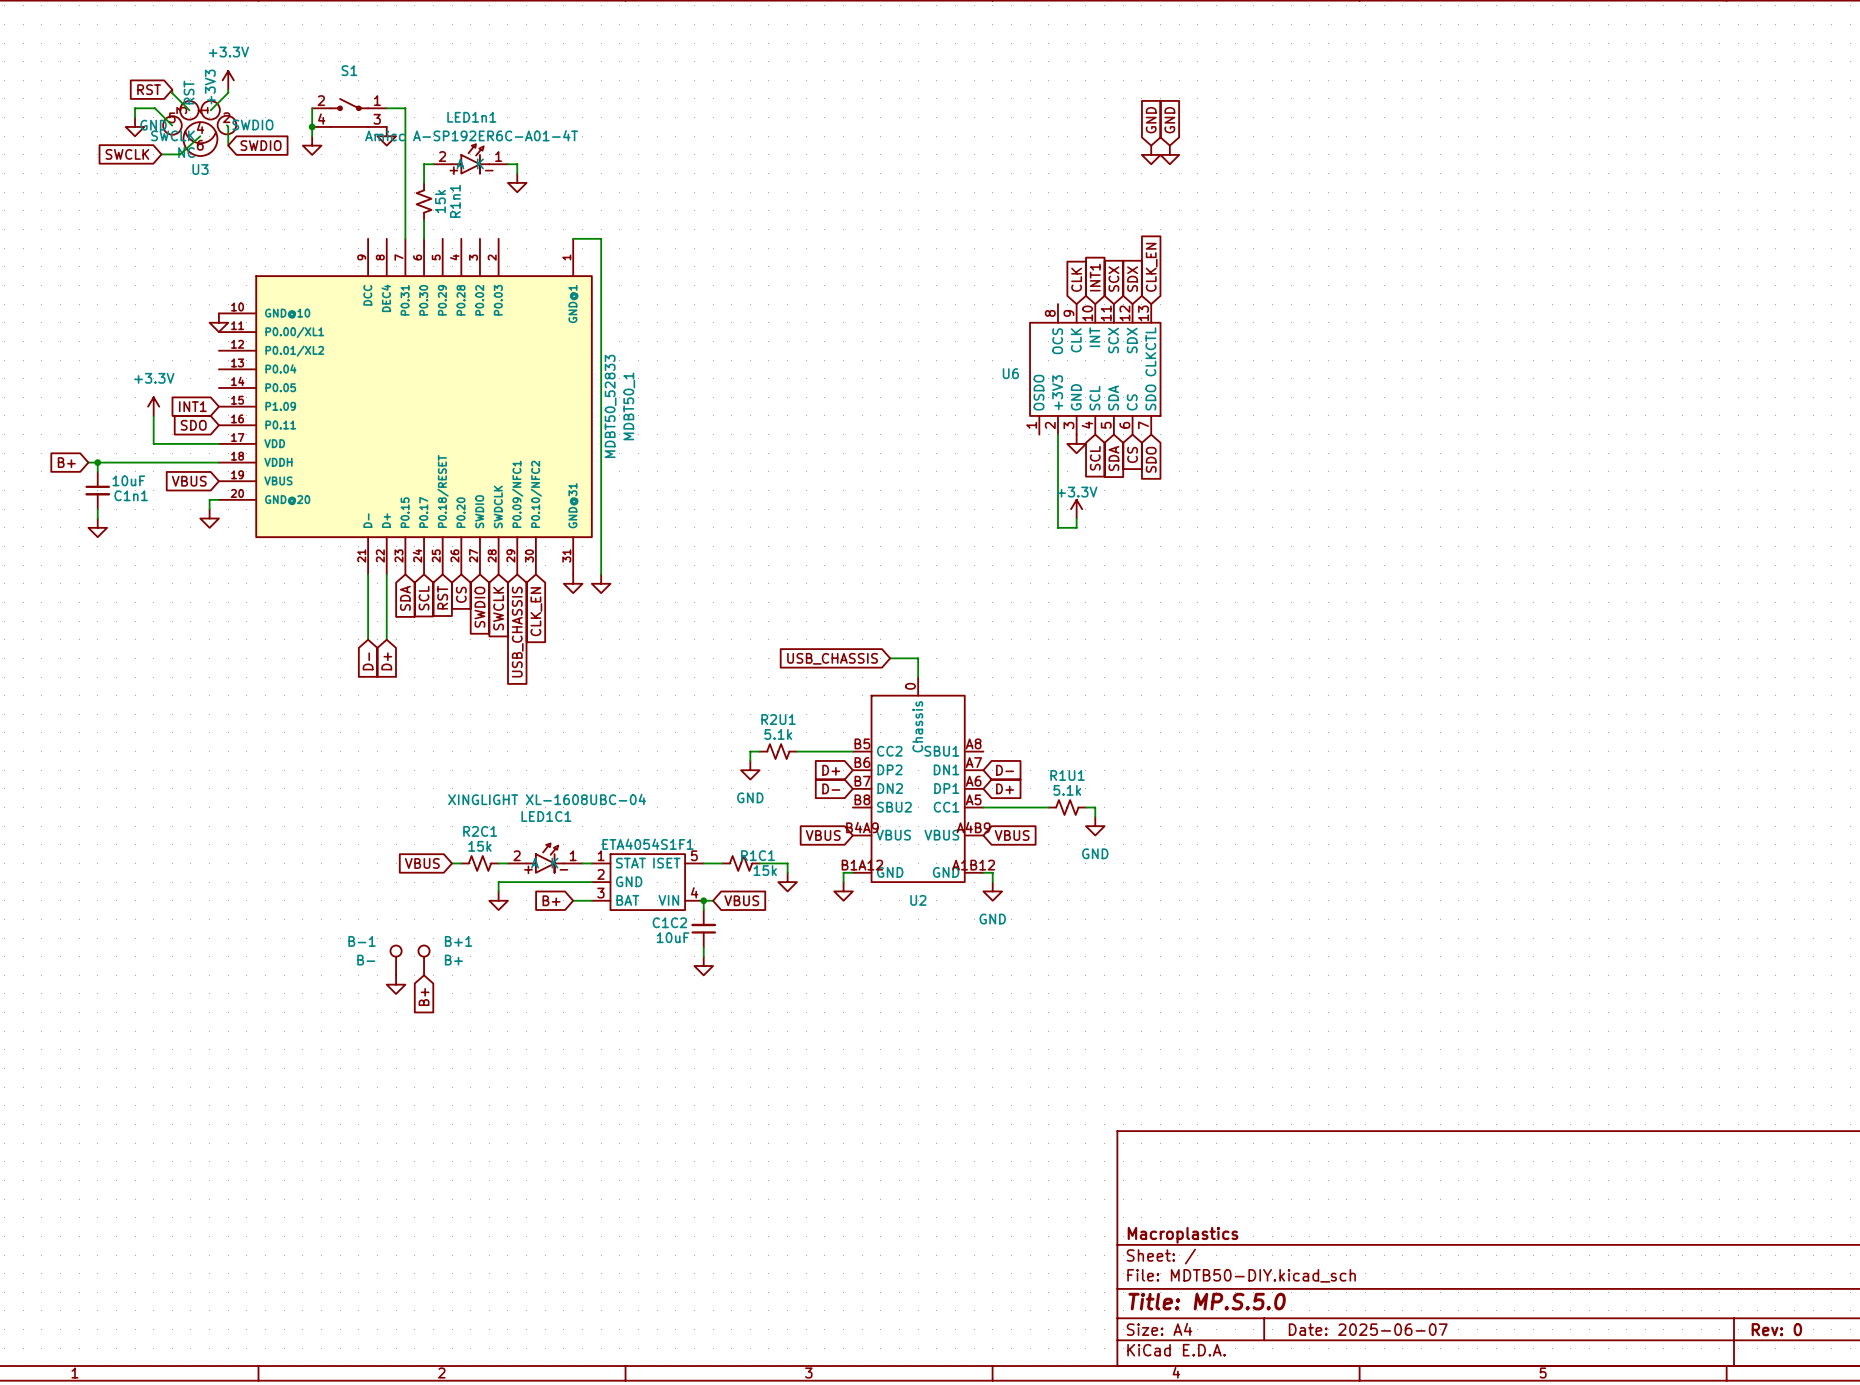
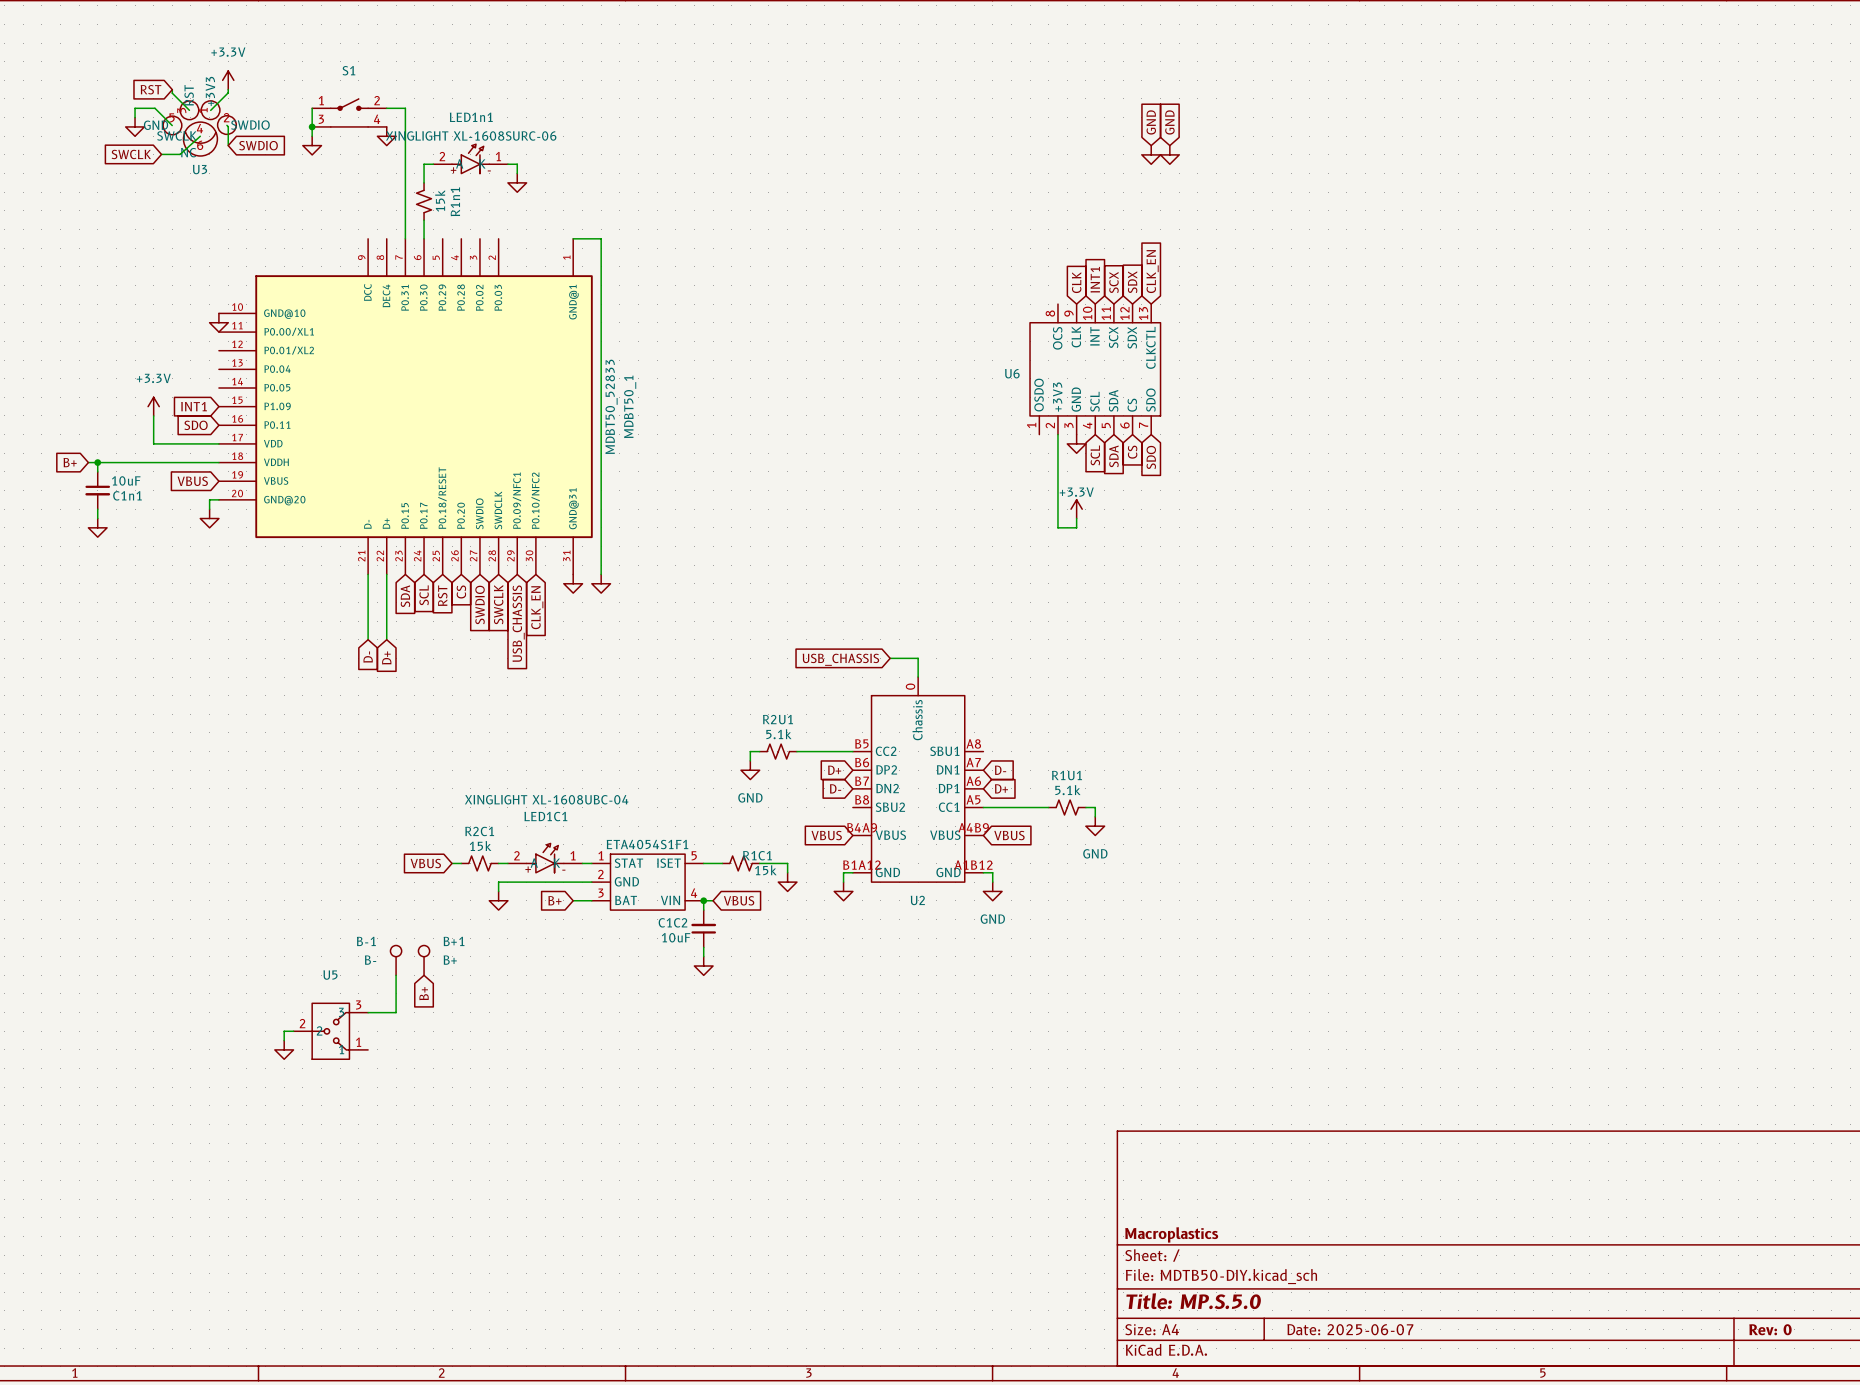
S1 flip: as is (349, 112) -> left-right (349, 112)
LED1n1 value: Amicc A-SP192ER6C-A01-4T (471, 135) -> XINGLIGHT XL-1608SURC-06 (471, 135)
wire: none -> (396, 975) (396, 1012) (368, 1012)
power symbol position: (396, 984) -> (284, 1049)
wire: none -> (293, 1031) (284, 1031) (284, 1040)
U5: none -> (330, 1031)

